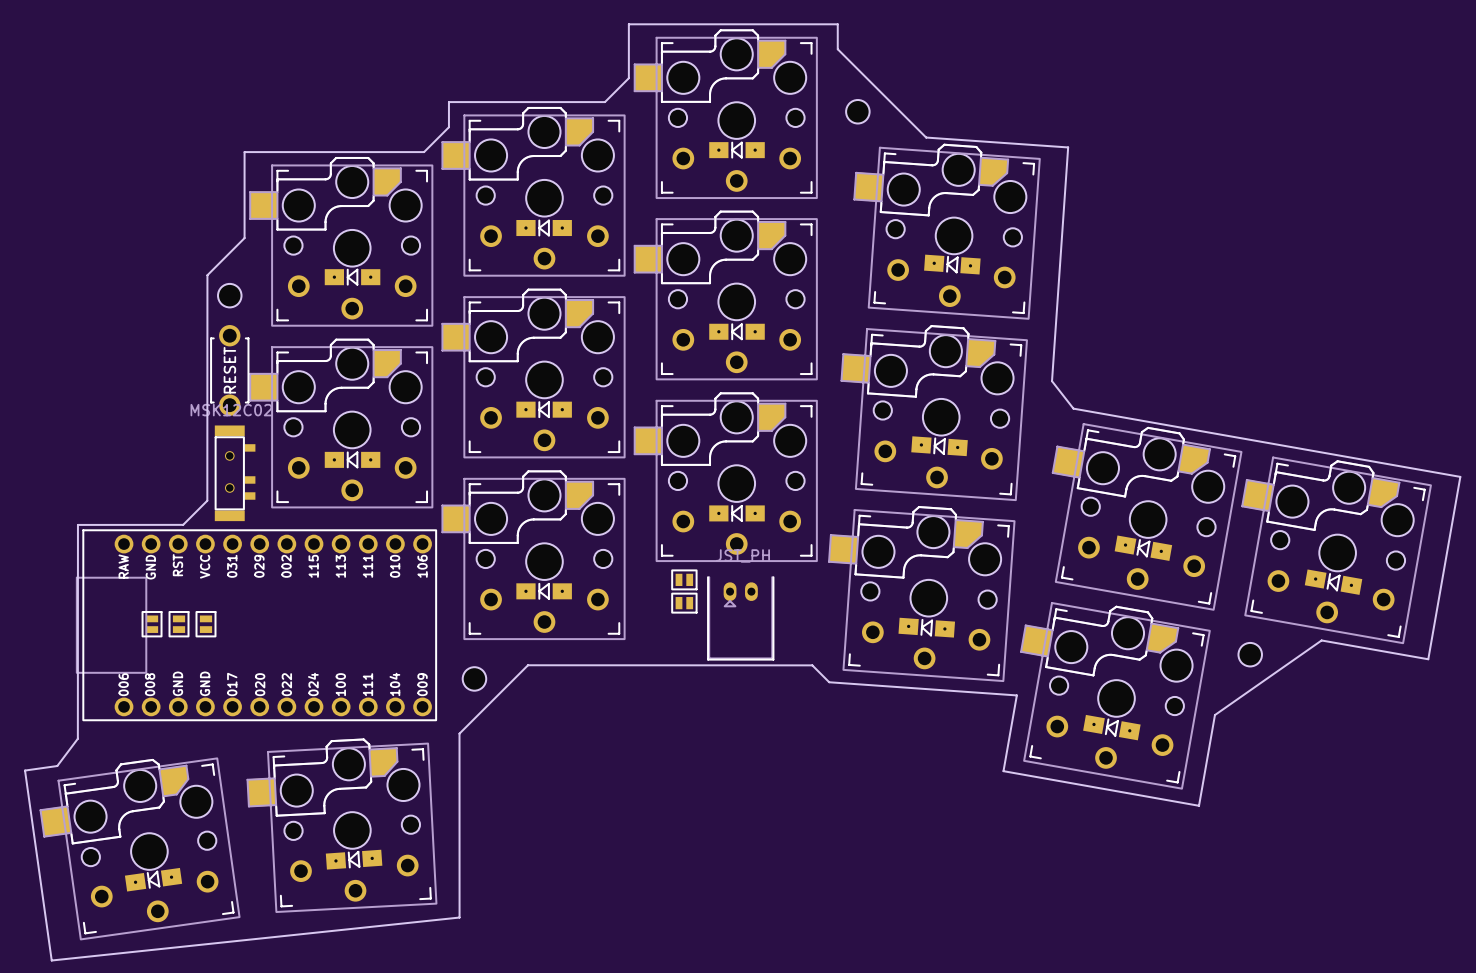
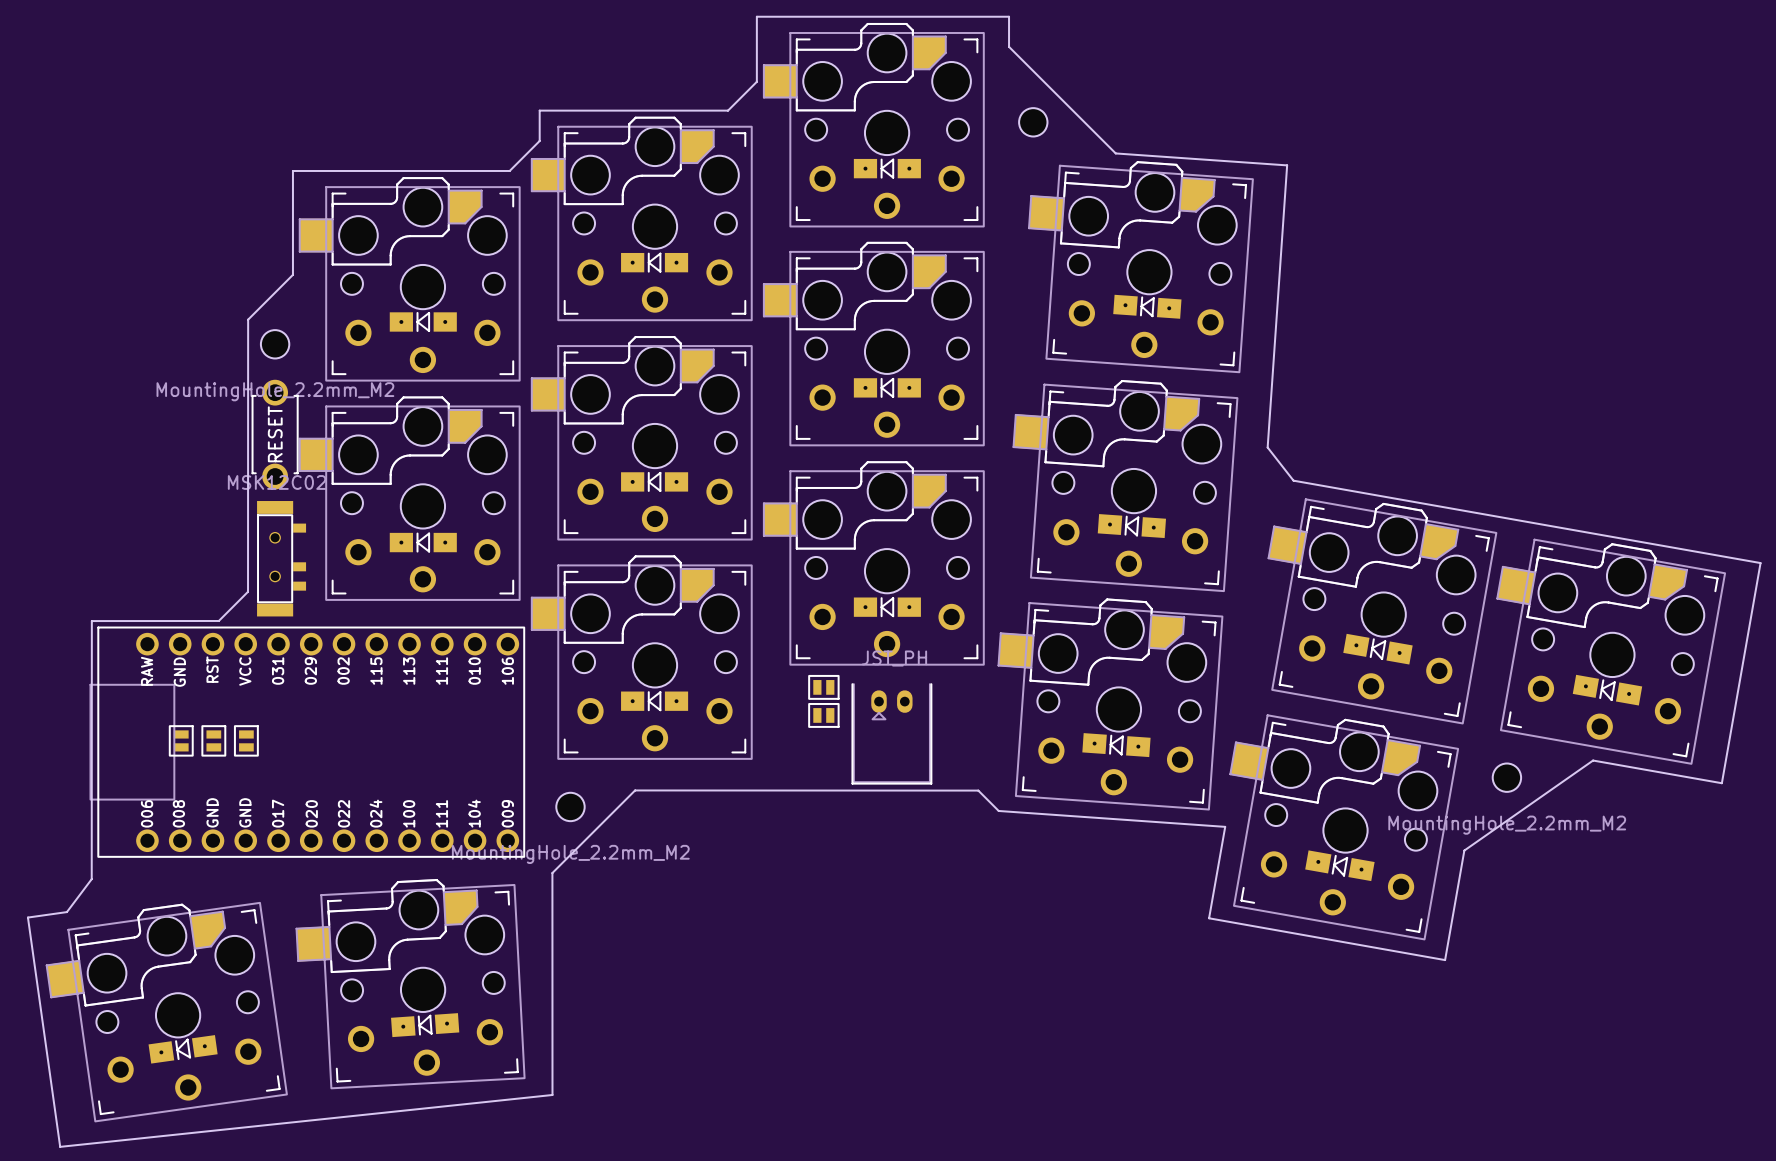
part value: none -> MountingHole_2.2mm_M2 (275, 391)
part value: none -> MountingHole_2.2mm_M2 (1507, 825)
part value: none -> MountingHole_2.2mm_M2 (570, 854)

